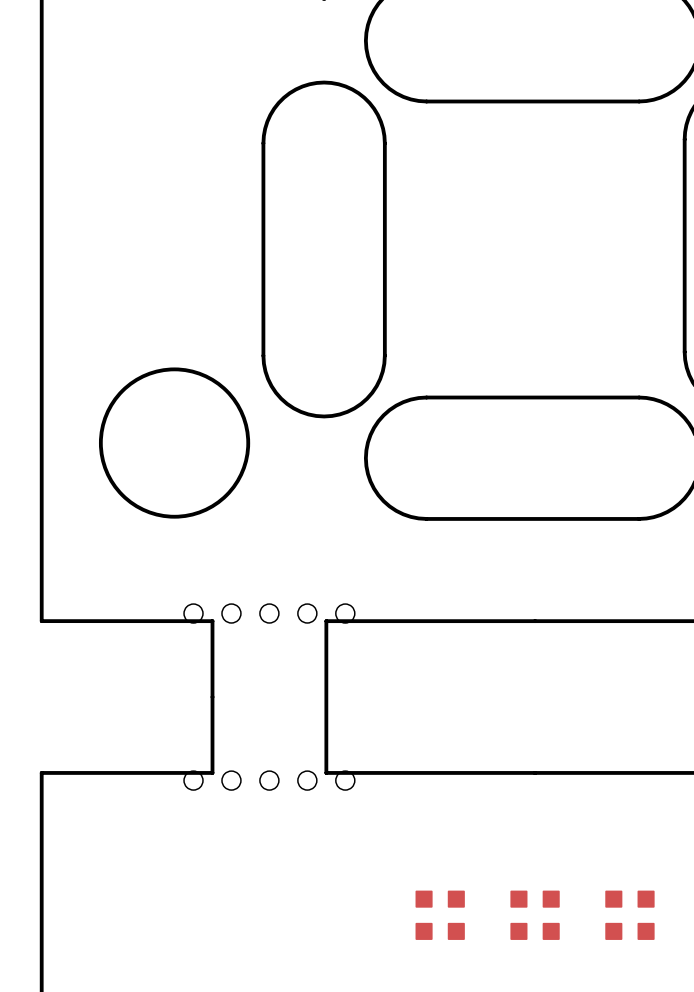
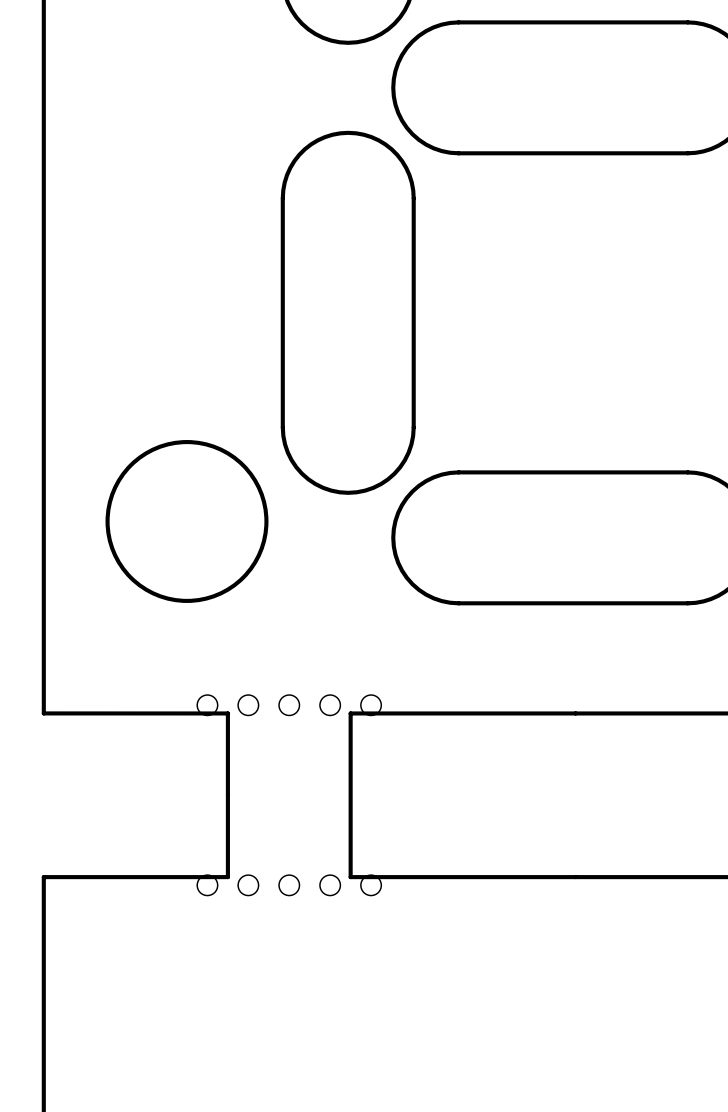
part: (440, 915) -> none
part: (535, 915) -> none
part: (629, 915) -> none

